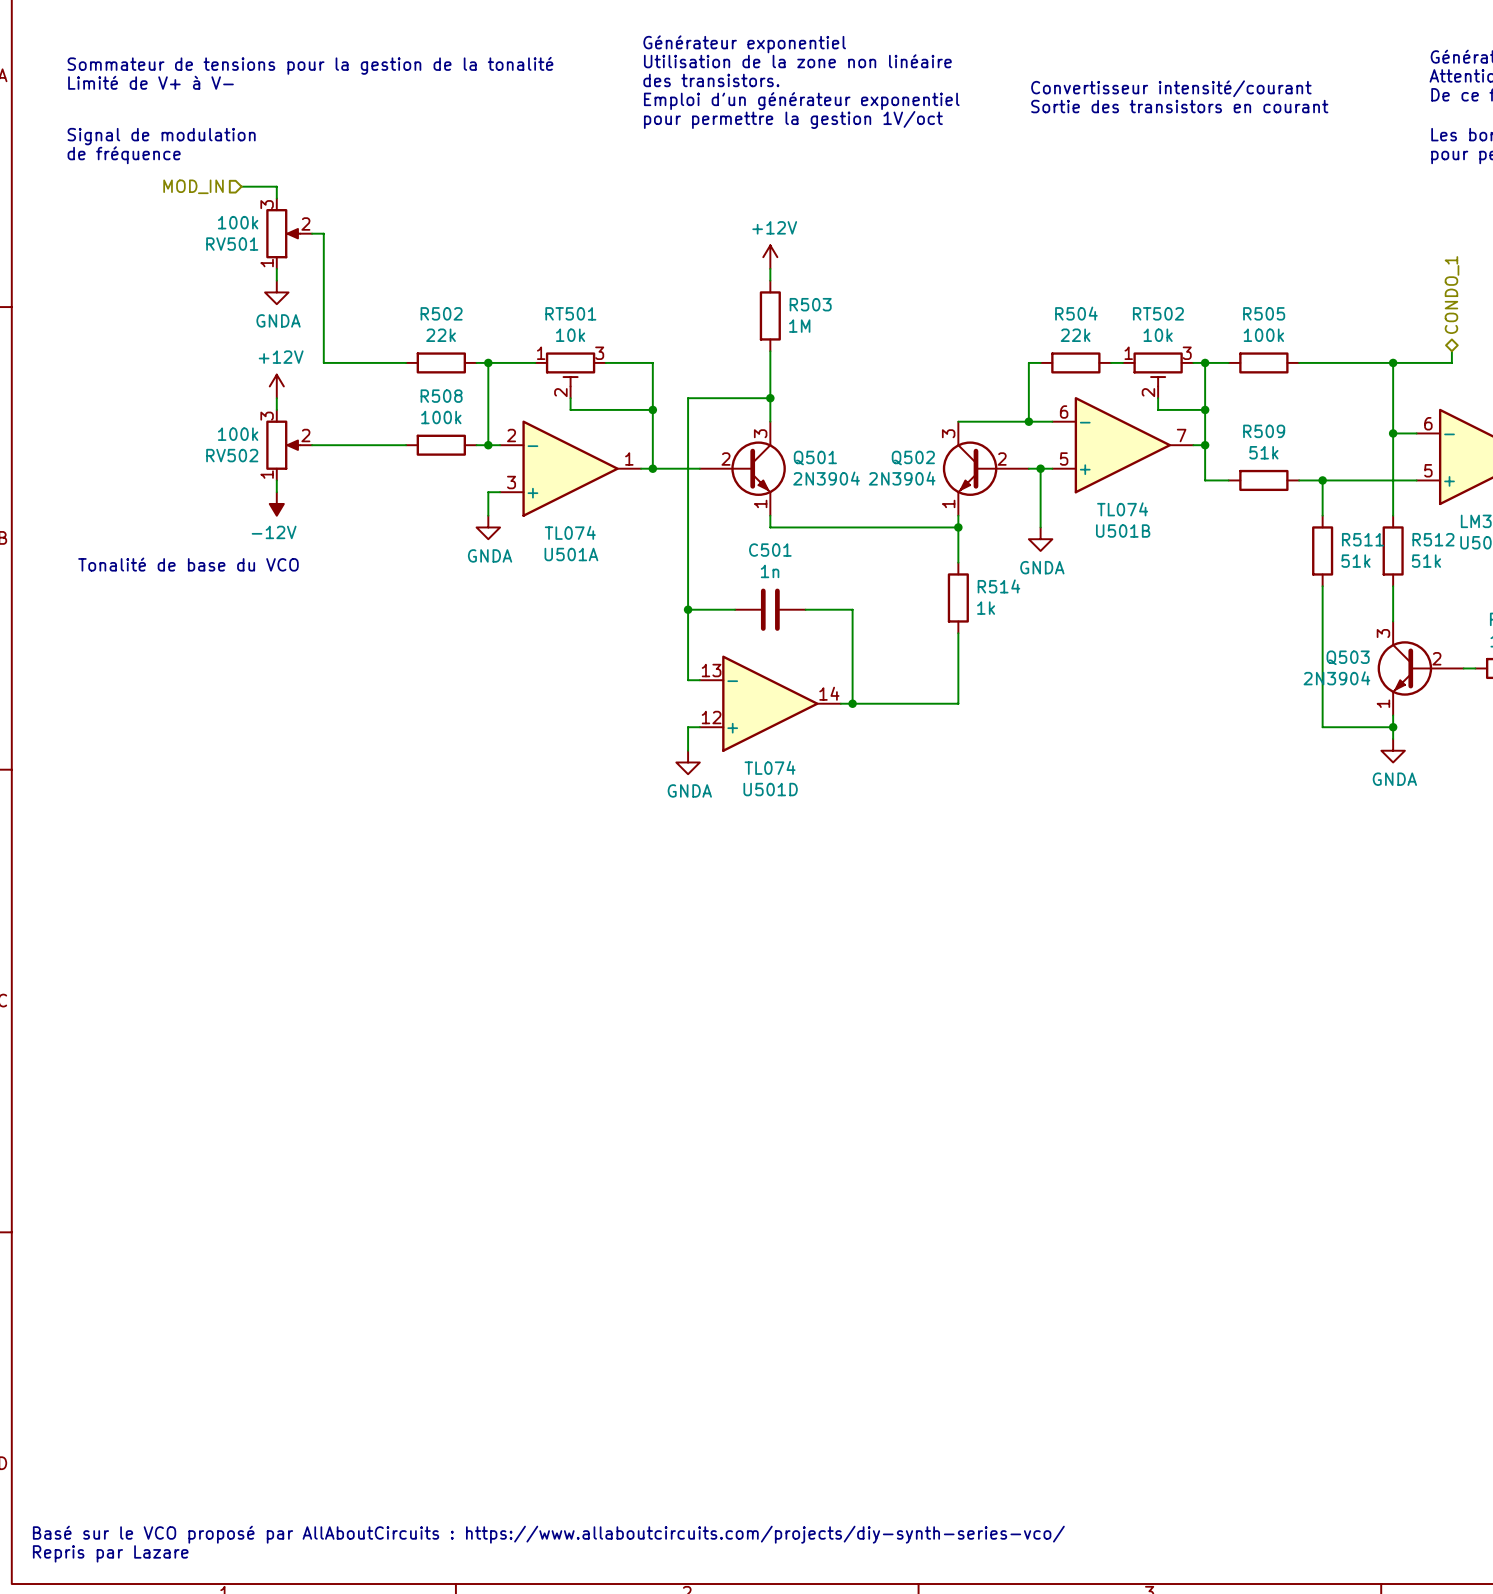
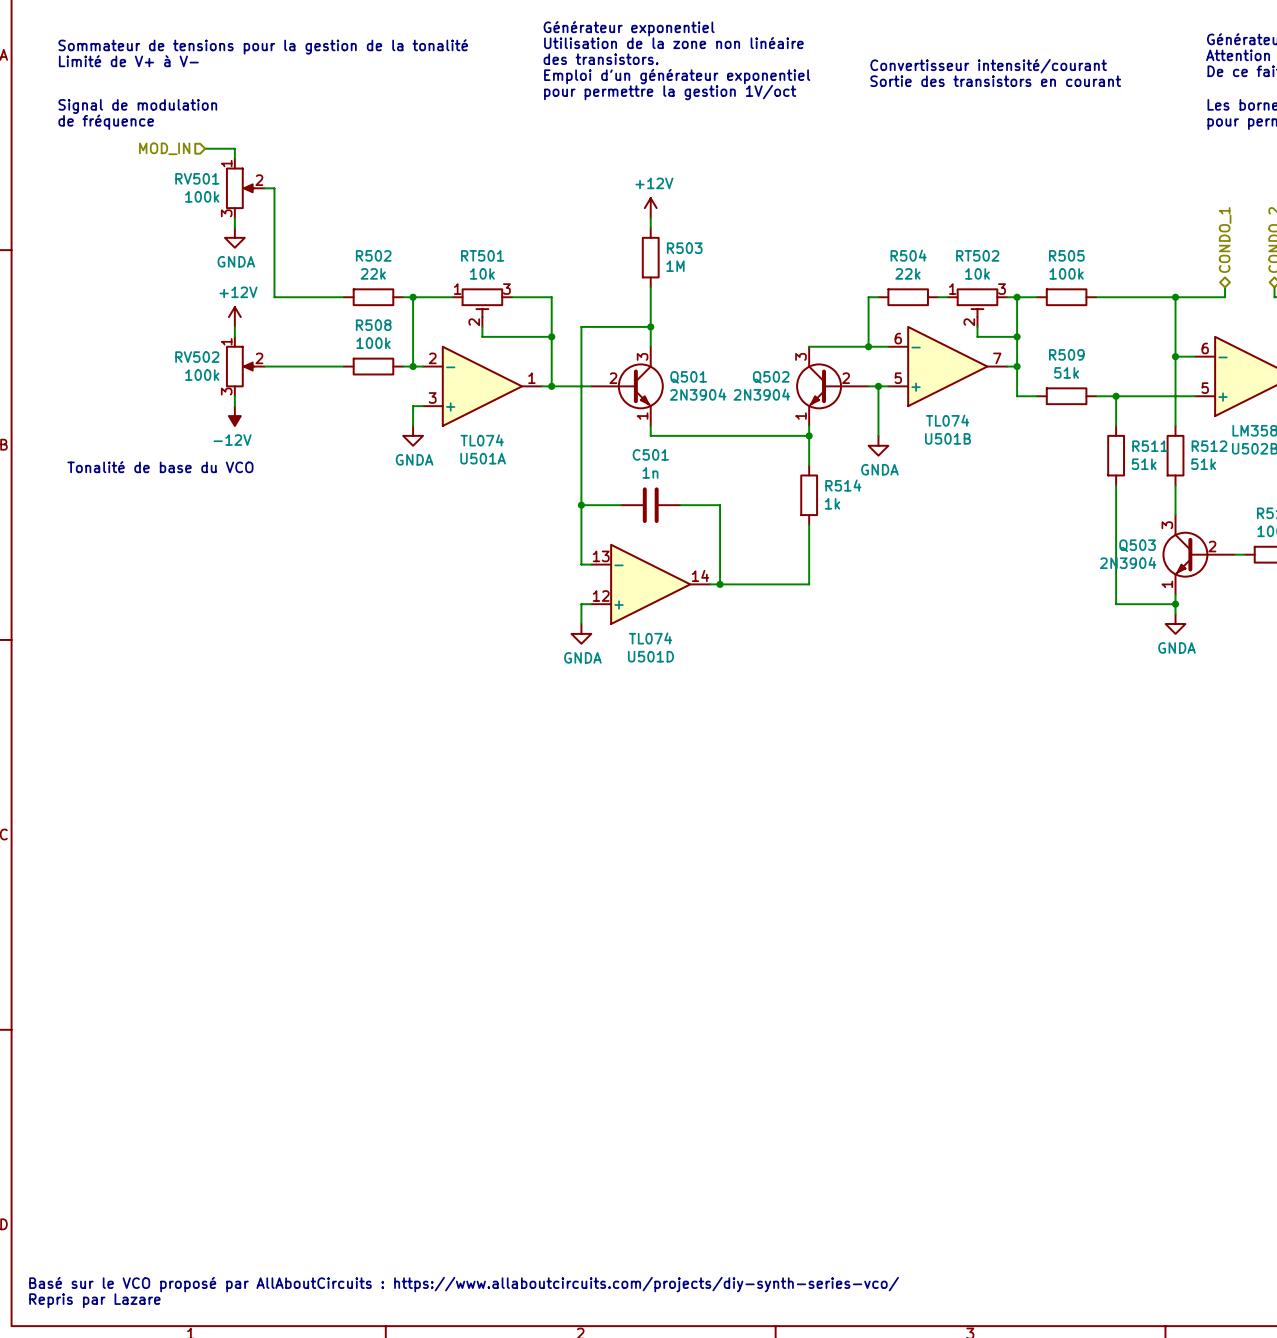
RV501 flip: as is (283, 233) -> up-down (240, 188)
RV502 flip: as is (283, 445) -> up-down (240, 366)

